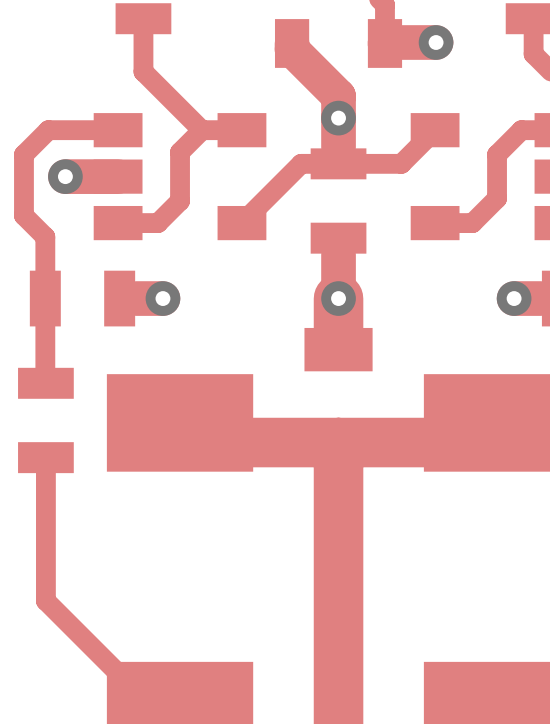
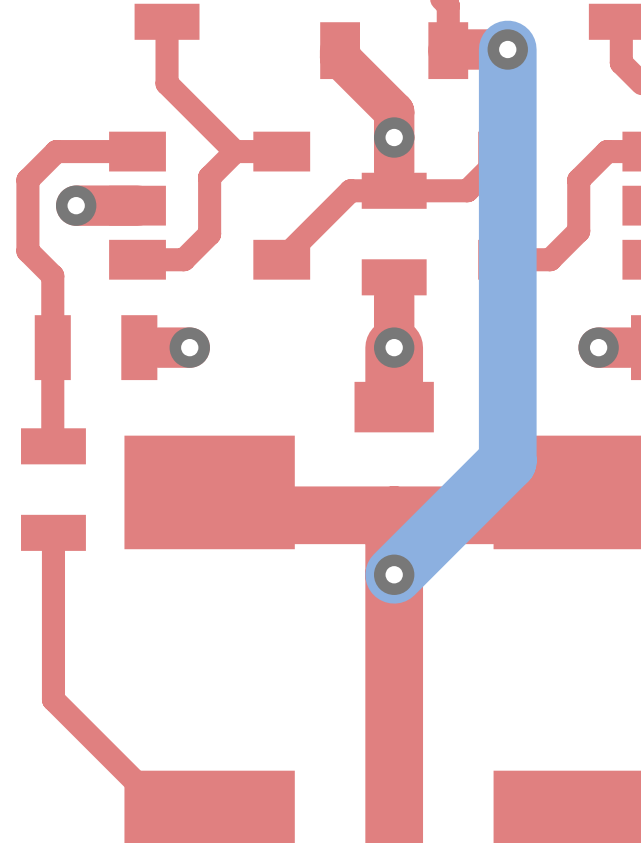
bottom track: none -> (507, 49) (507, 461) (394, 574)
via: none -> (394, 574)

